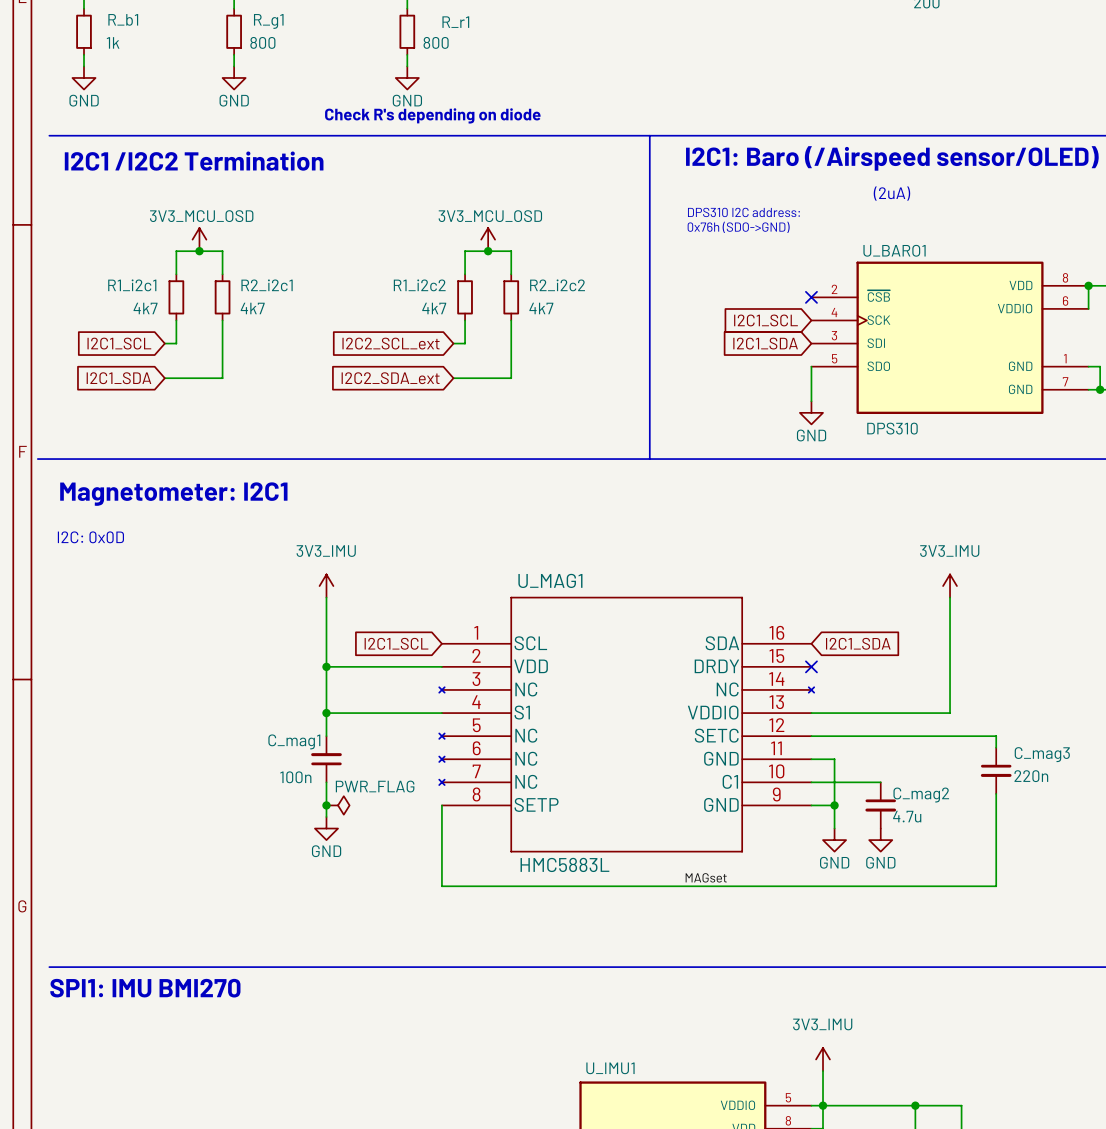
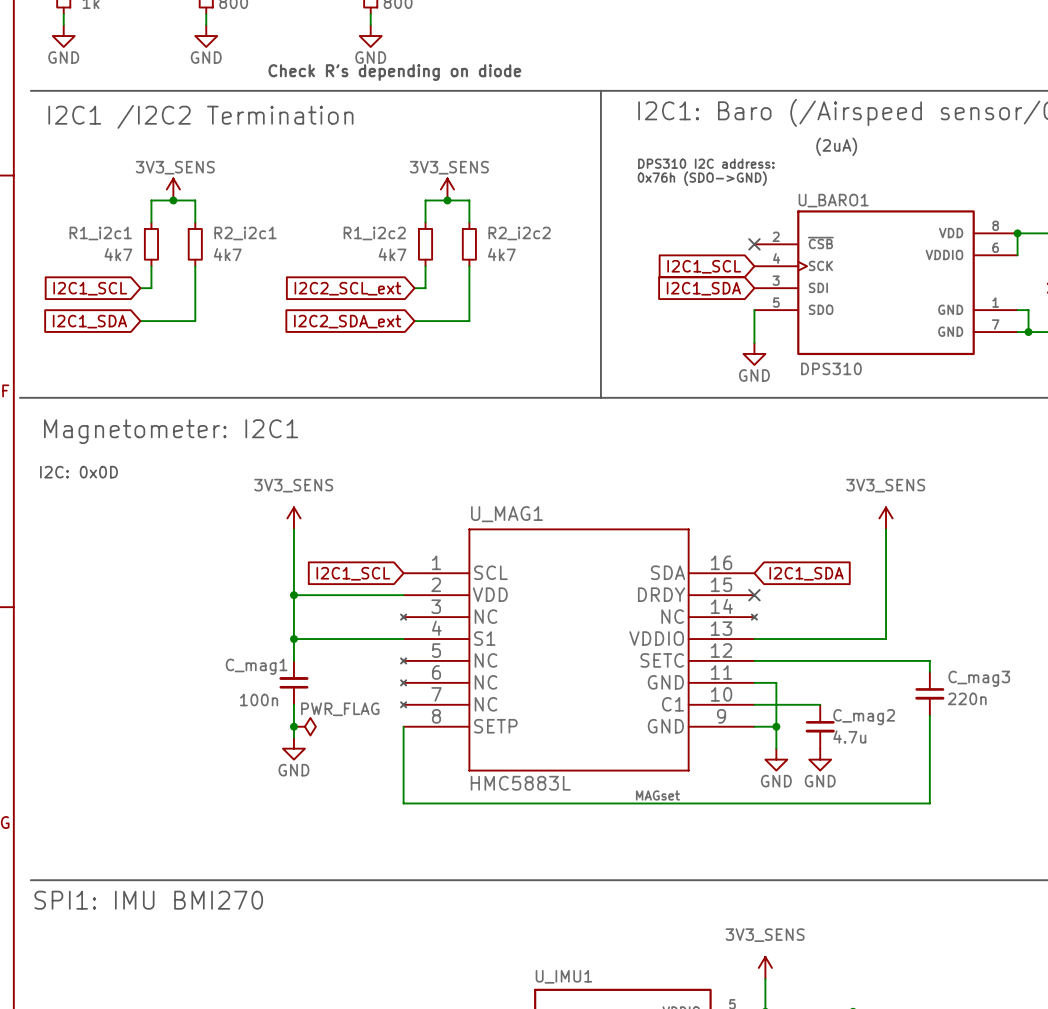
power symbol: 3V3_MCU_OSD (199, 239) -> 3V3_SENS (173, 189)
power symbol: 3V3_MCU_OSD (488, 239) -> 3V3_SENS (447, 189)
power symbol: 3V3_IMU (326, 586) -> 3V3_SENS (293, 518)
power symbol: 3V3_IMU (950, 586) -> 3V3_SENS (886, 518)
power symbol: 3V3_IMU (823, 1059) -> 3V3_SENS (765, 967)

